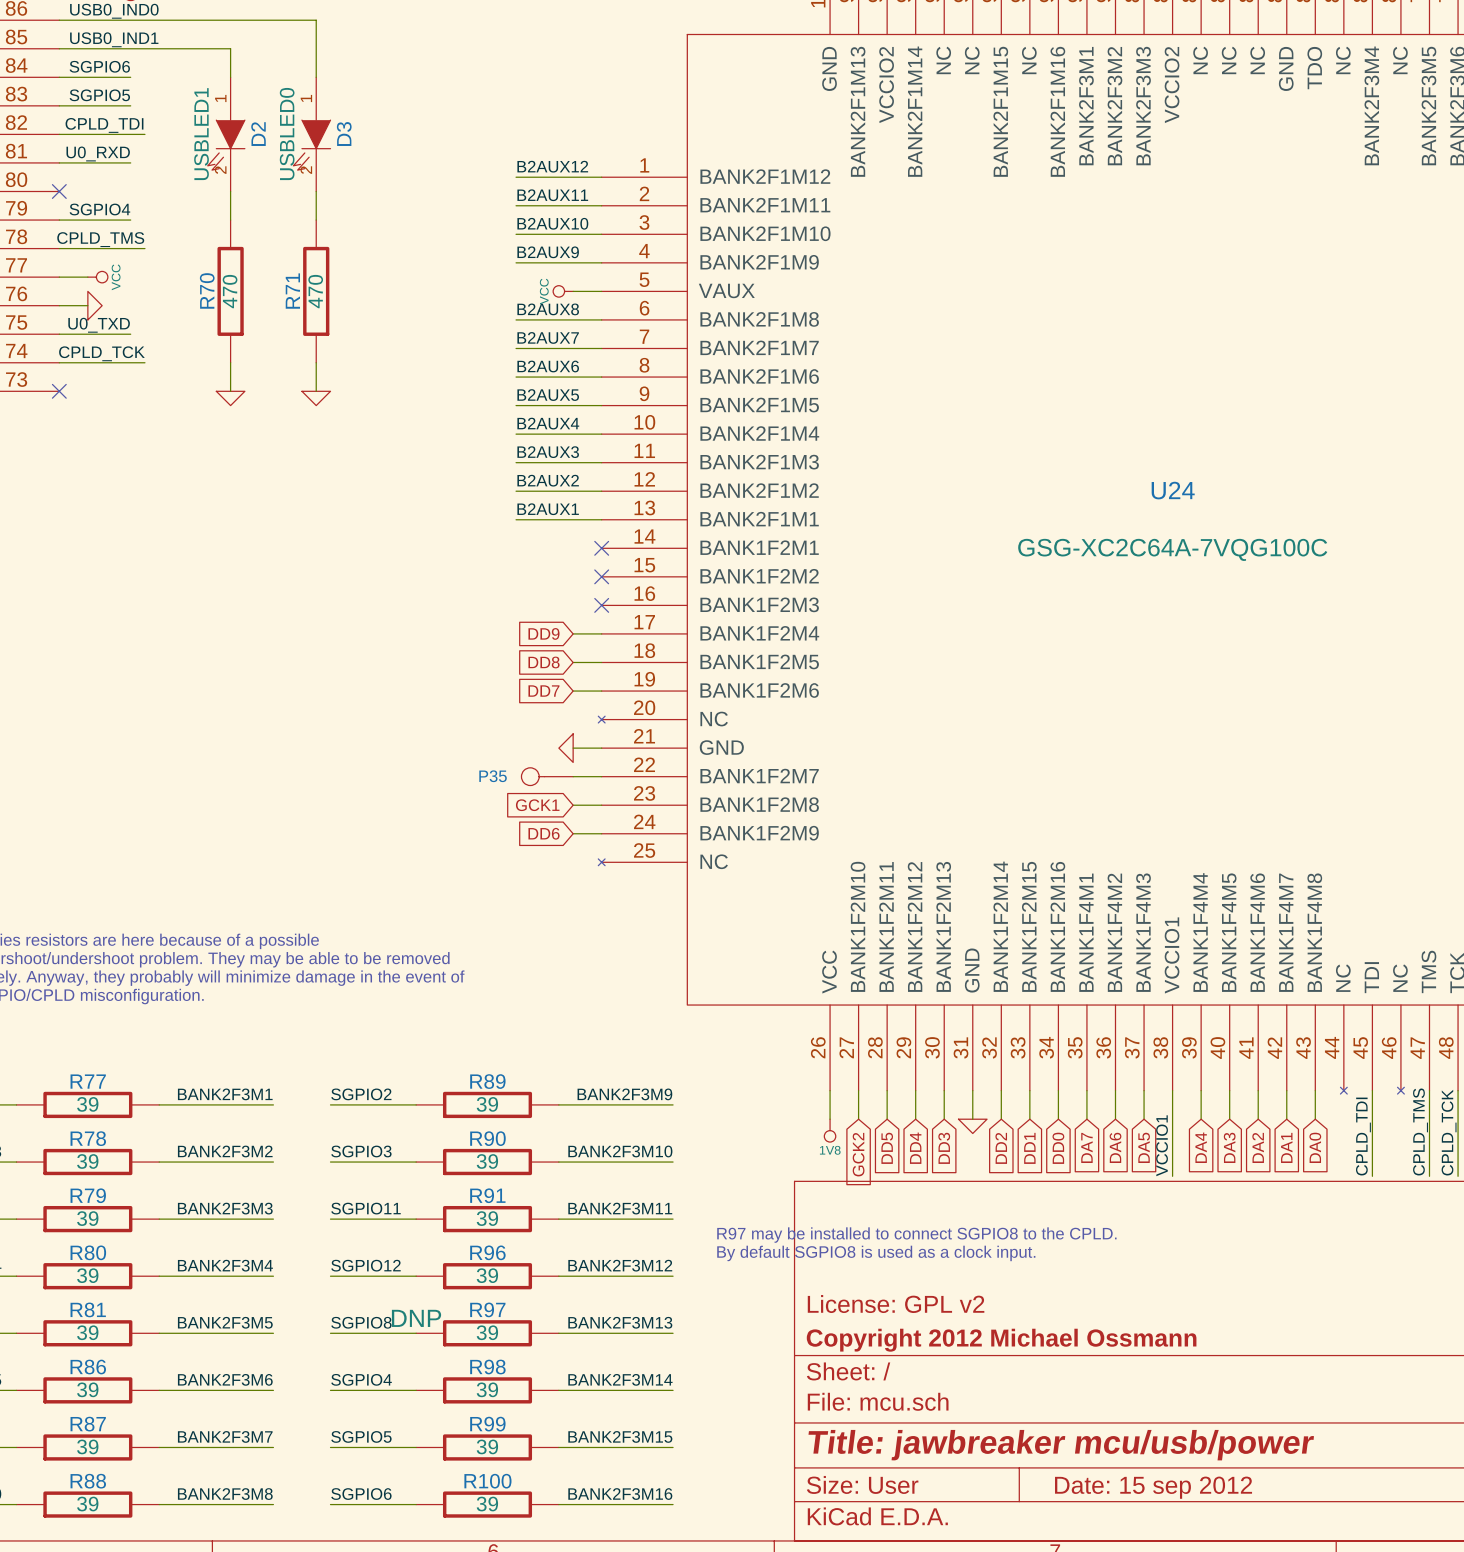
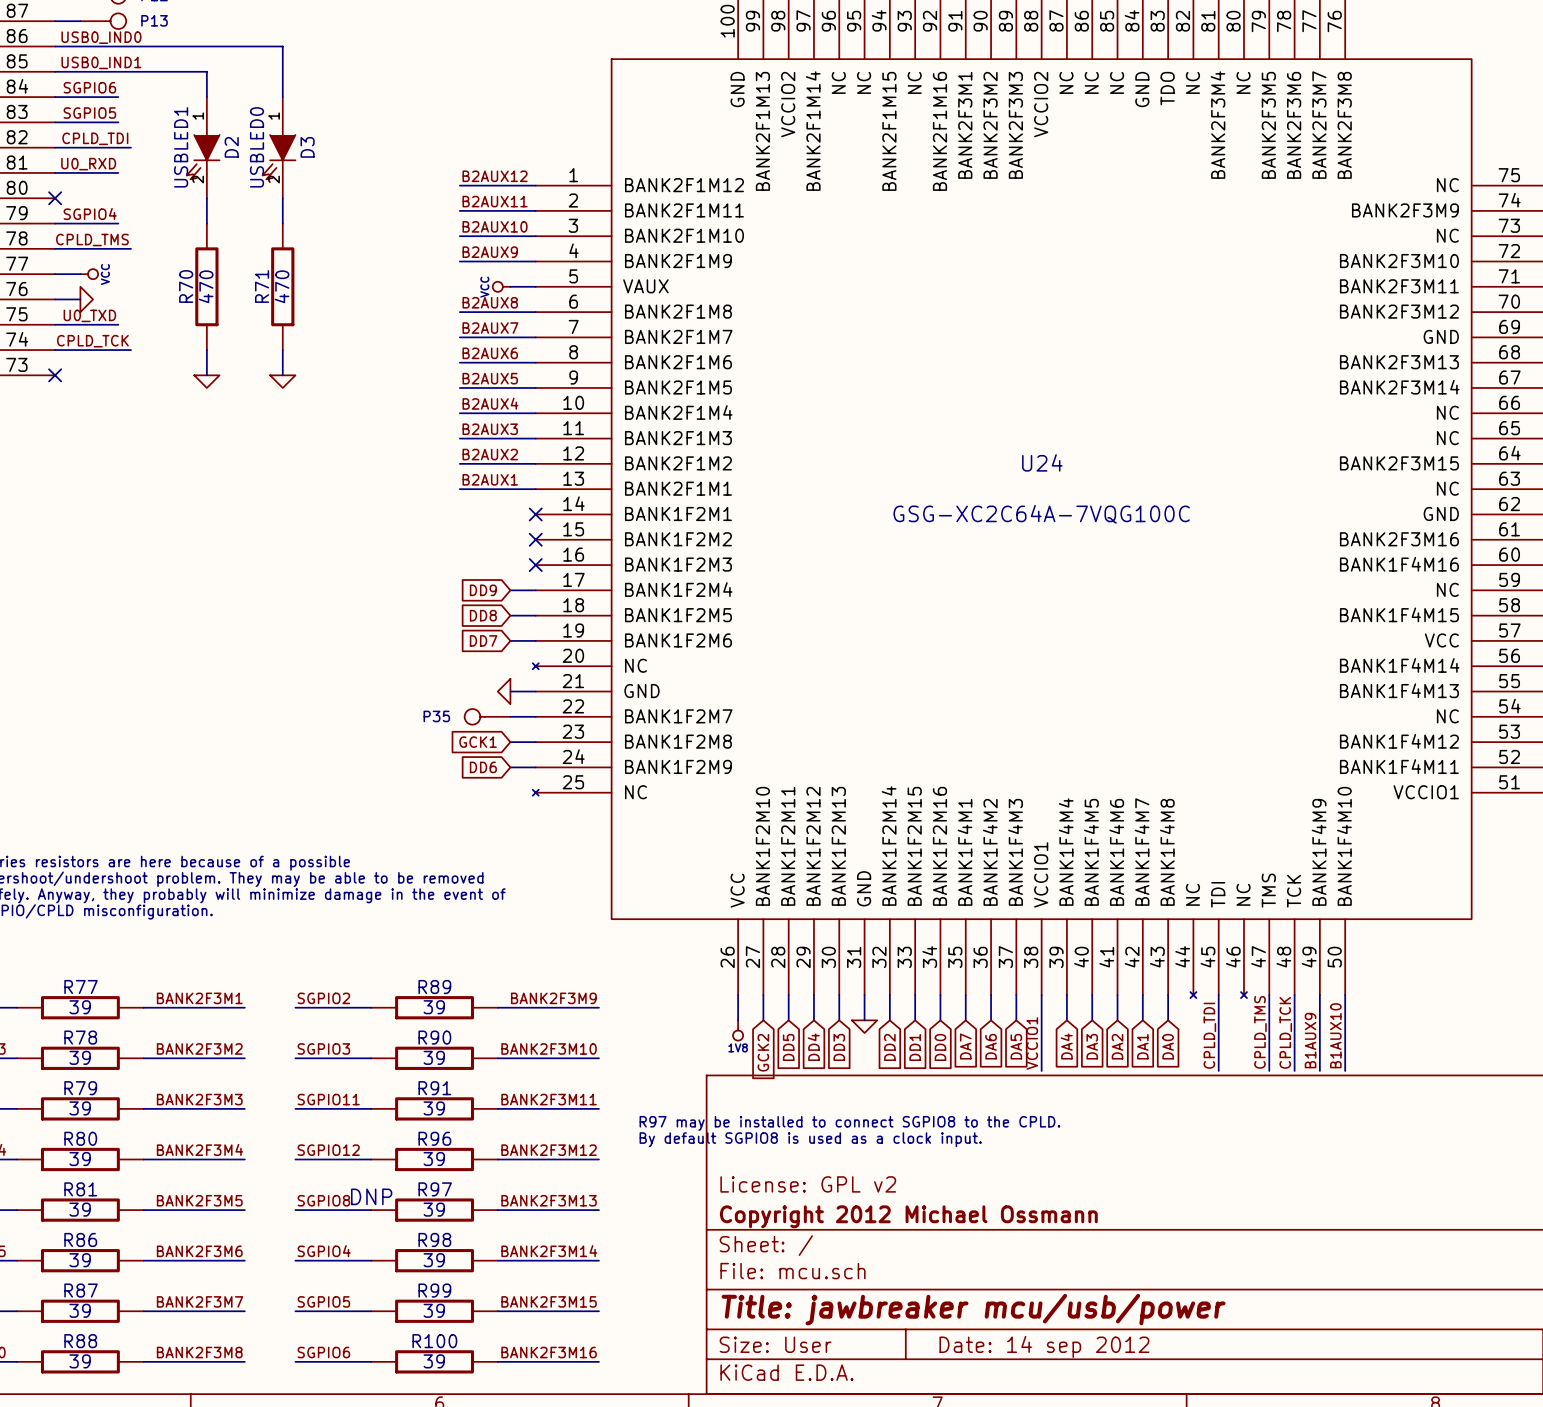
title block: Date: 15 sep 2012 (1153, 1487) -> Date: 14 sep 2012 (1044, 1346)

